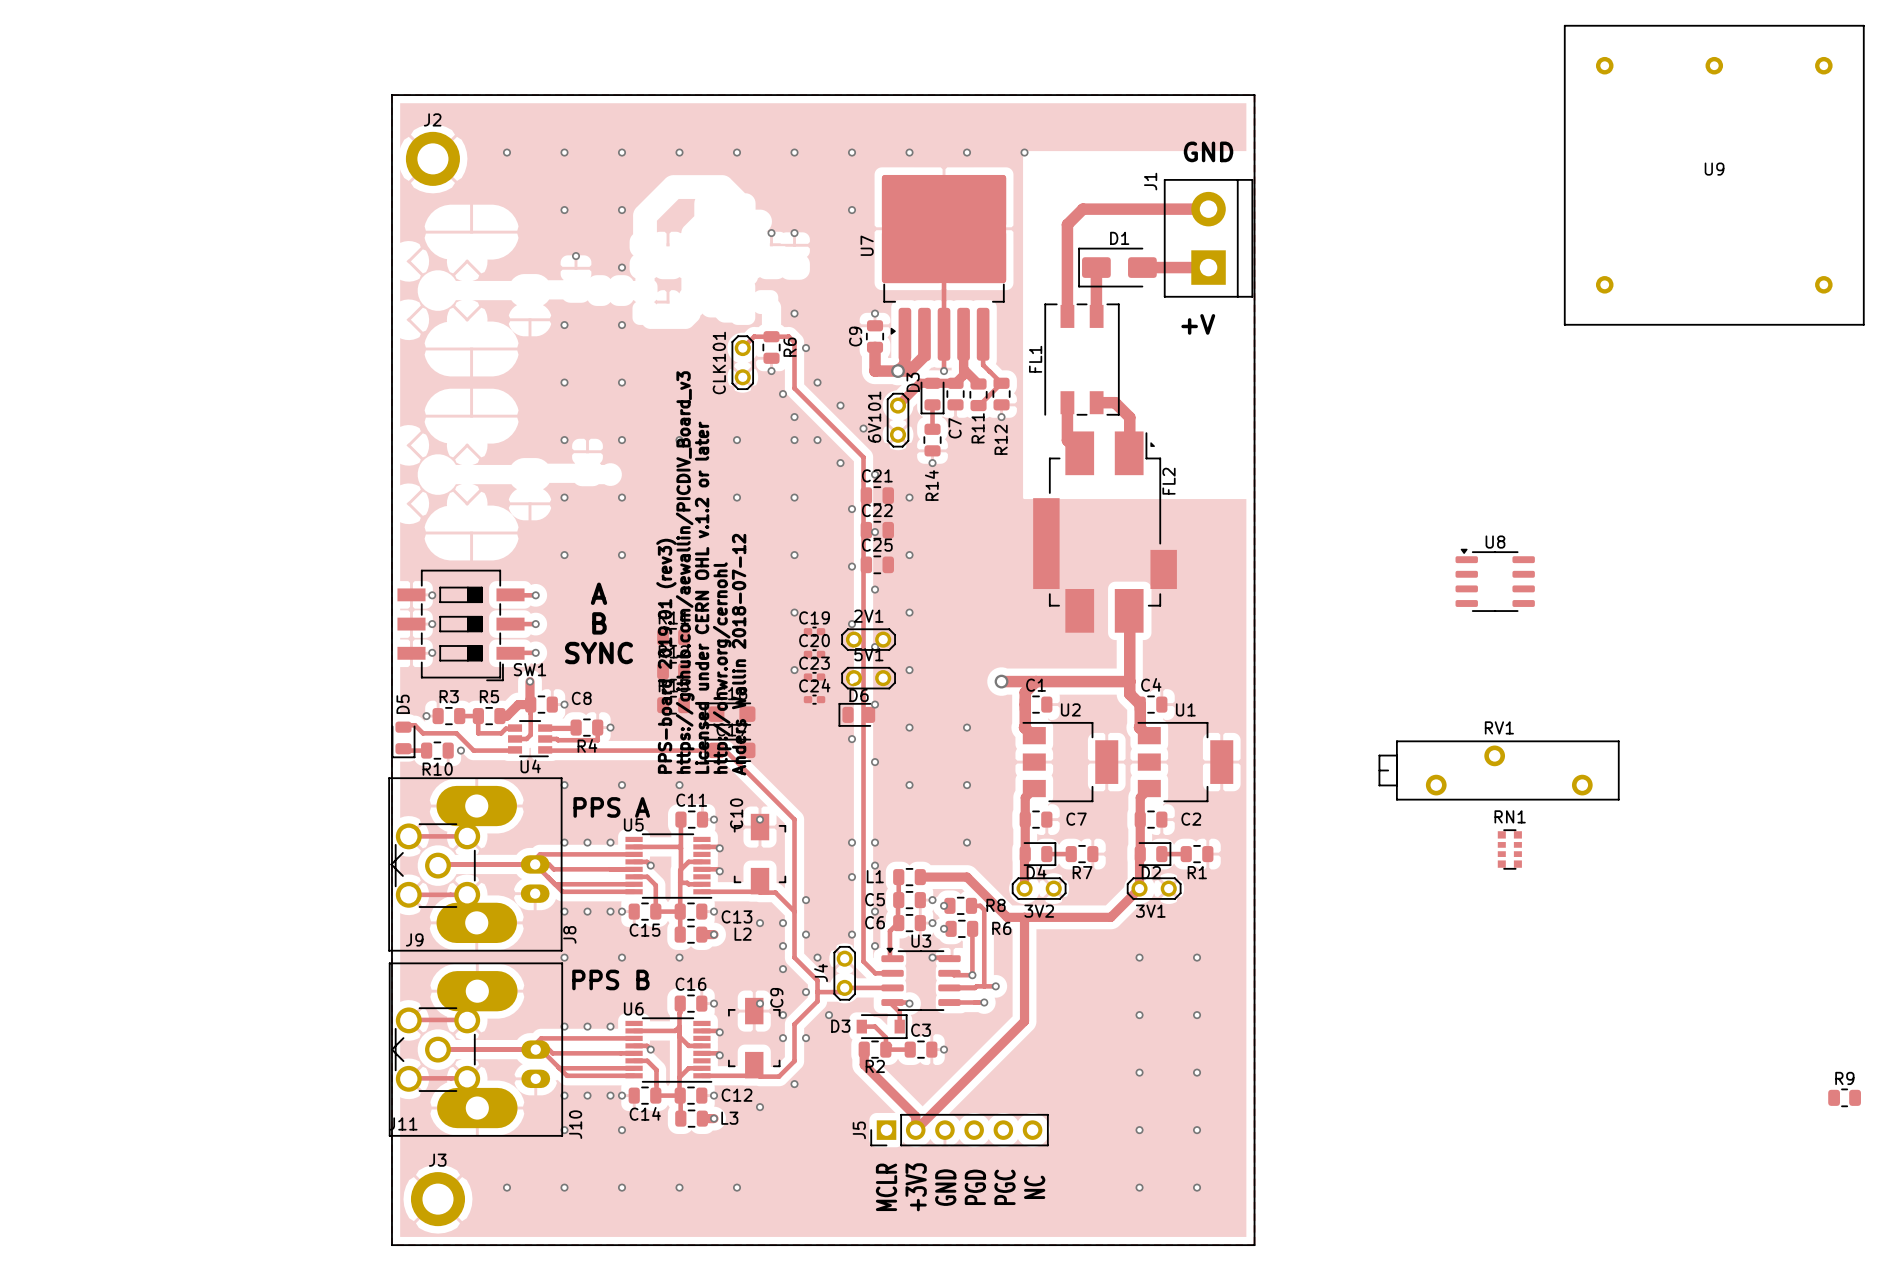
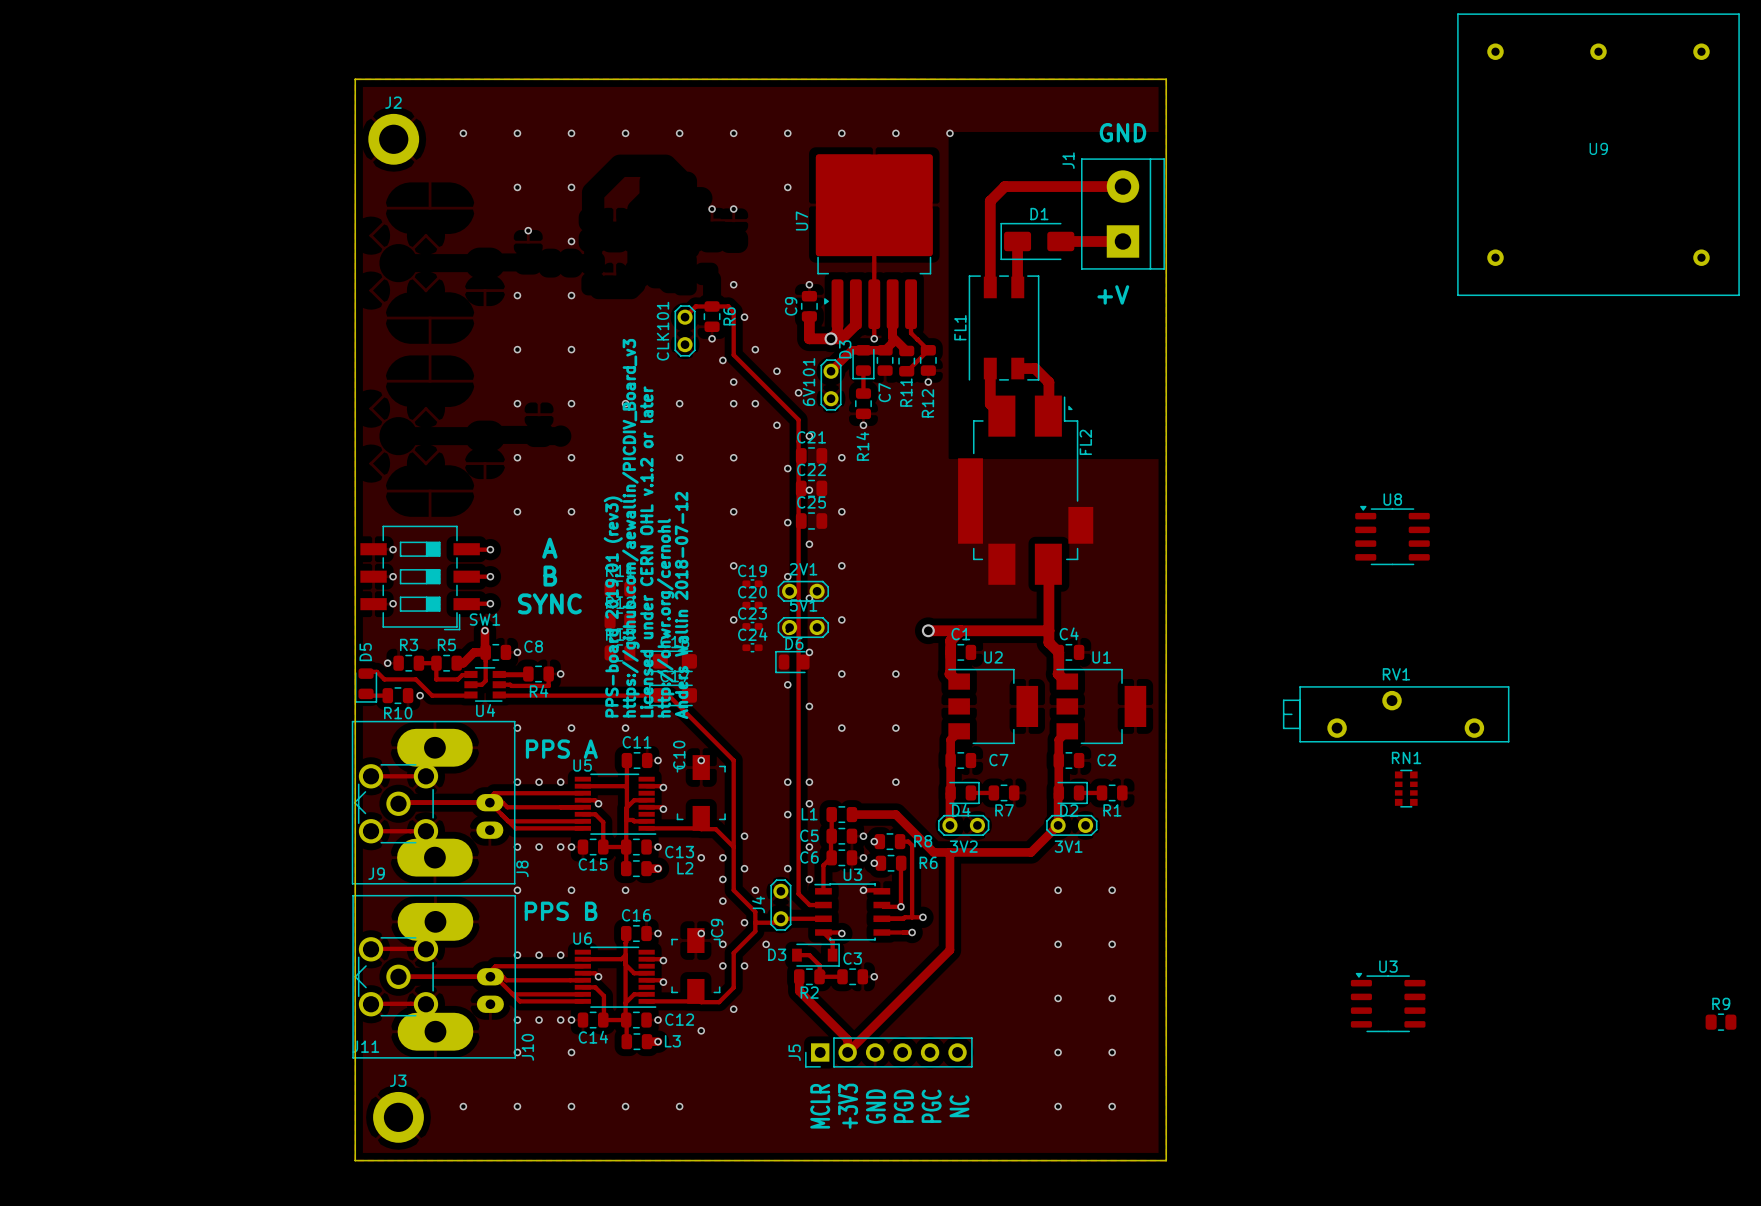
U3 footprint: [881, 947, 961, 1011] -> [814, 883, 891, 941]
U3: none -> (1388, 1002)

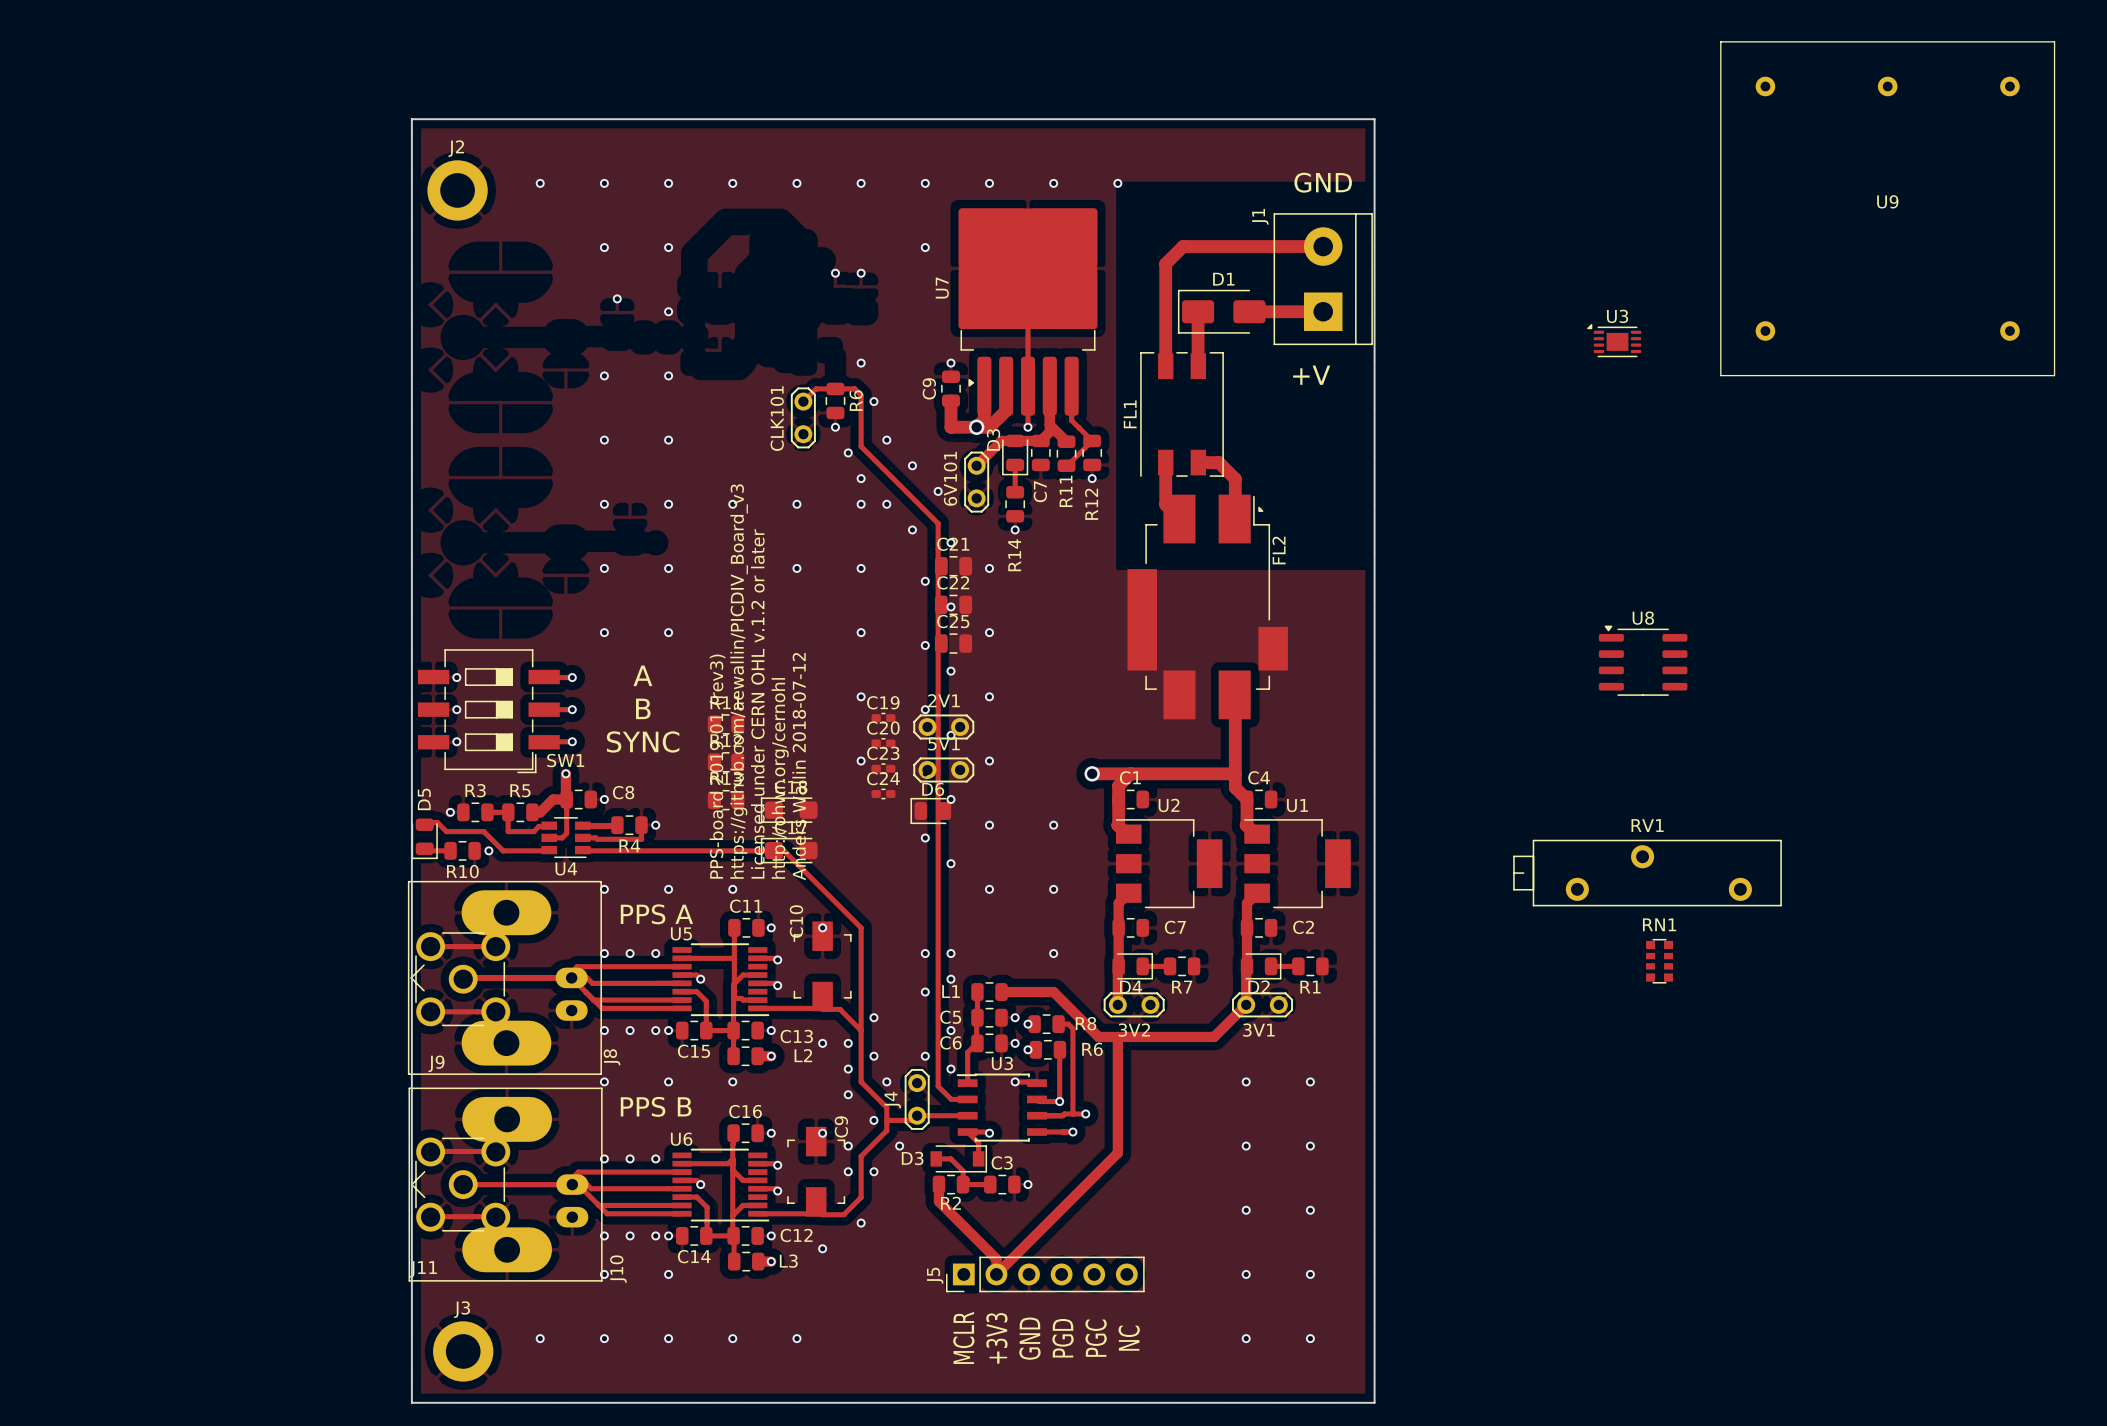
U3: none -> (1614, 340)
U3: (1388, 1002) -> none
R9: (1721, 1022) -> none

